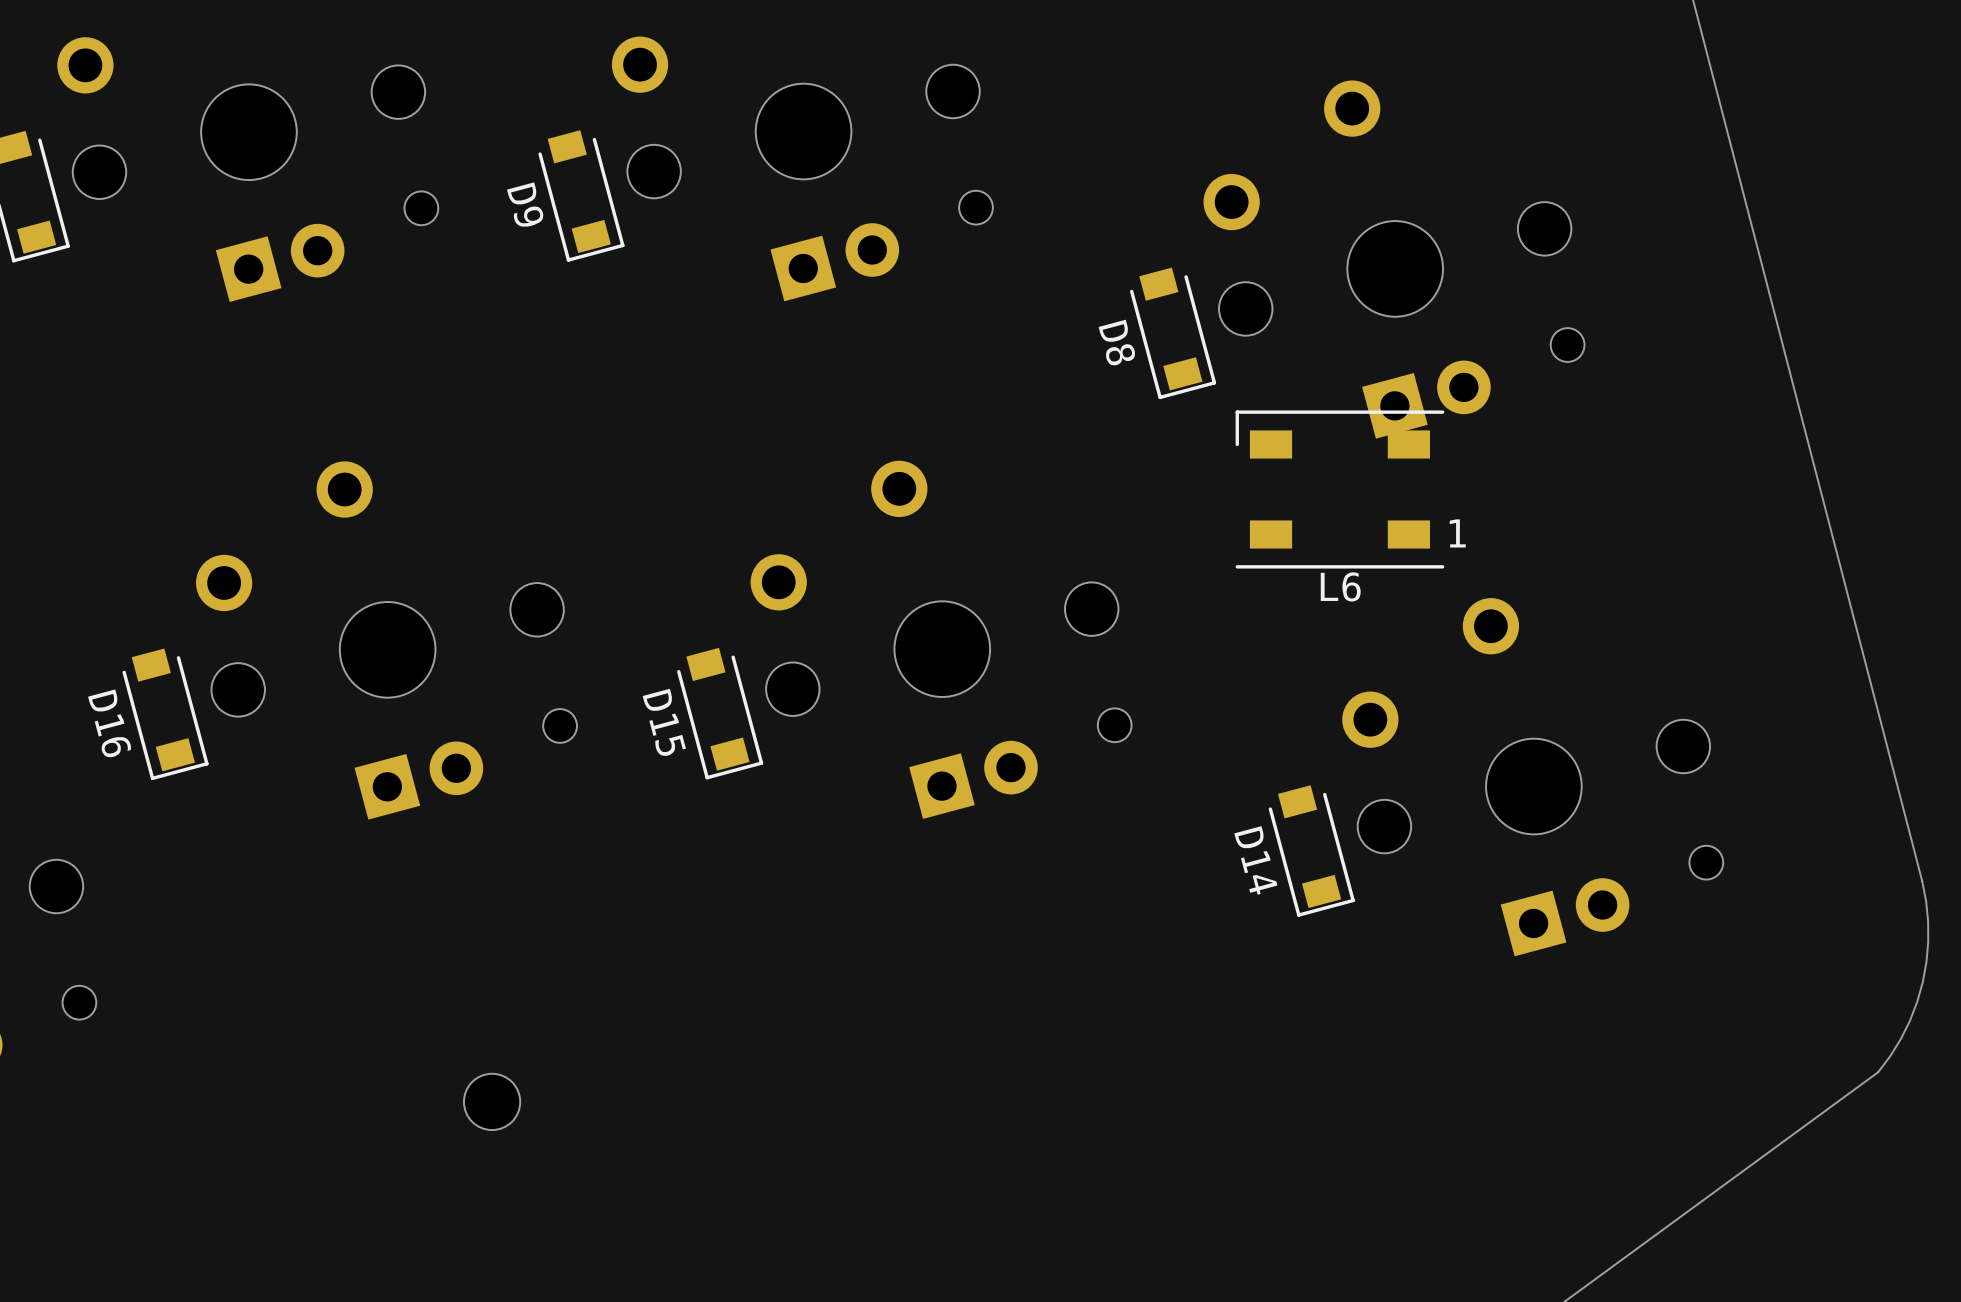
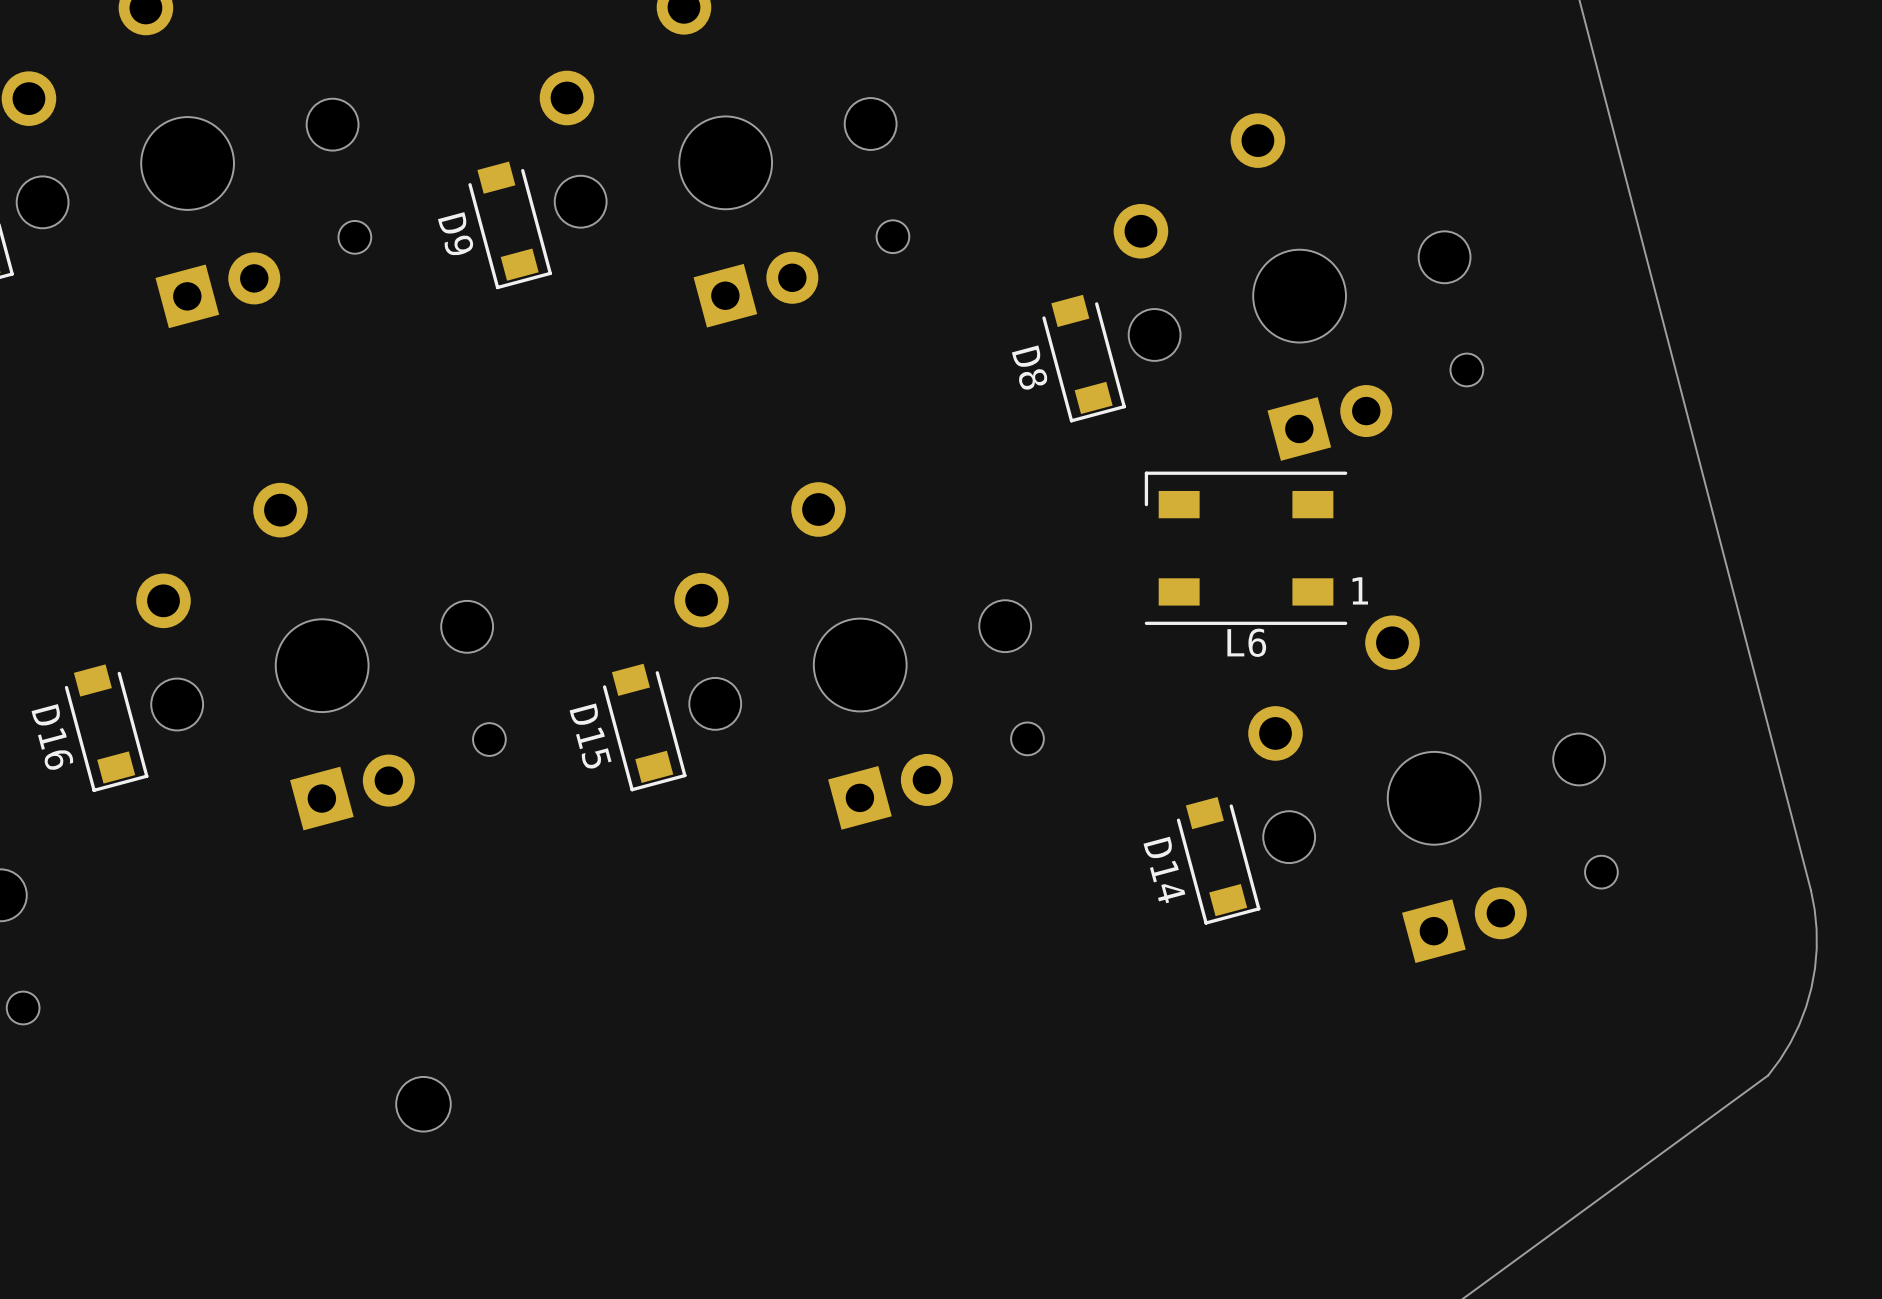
L6 position: (1339, 489) -> (1246, 548)

